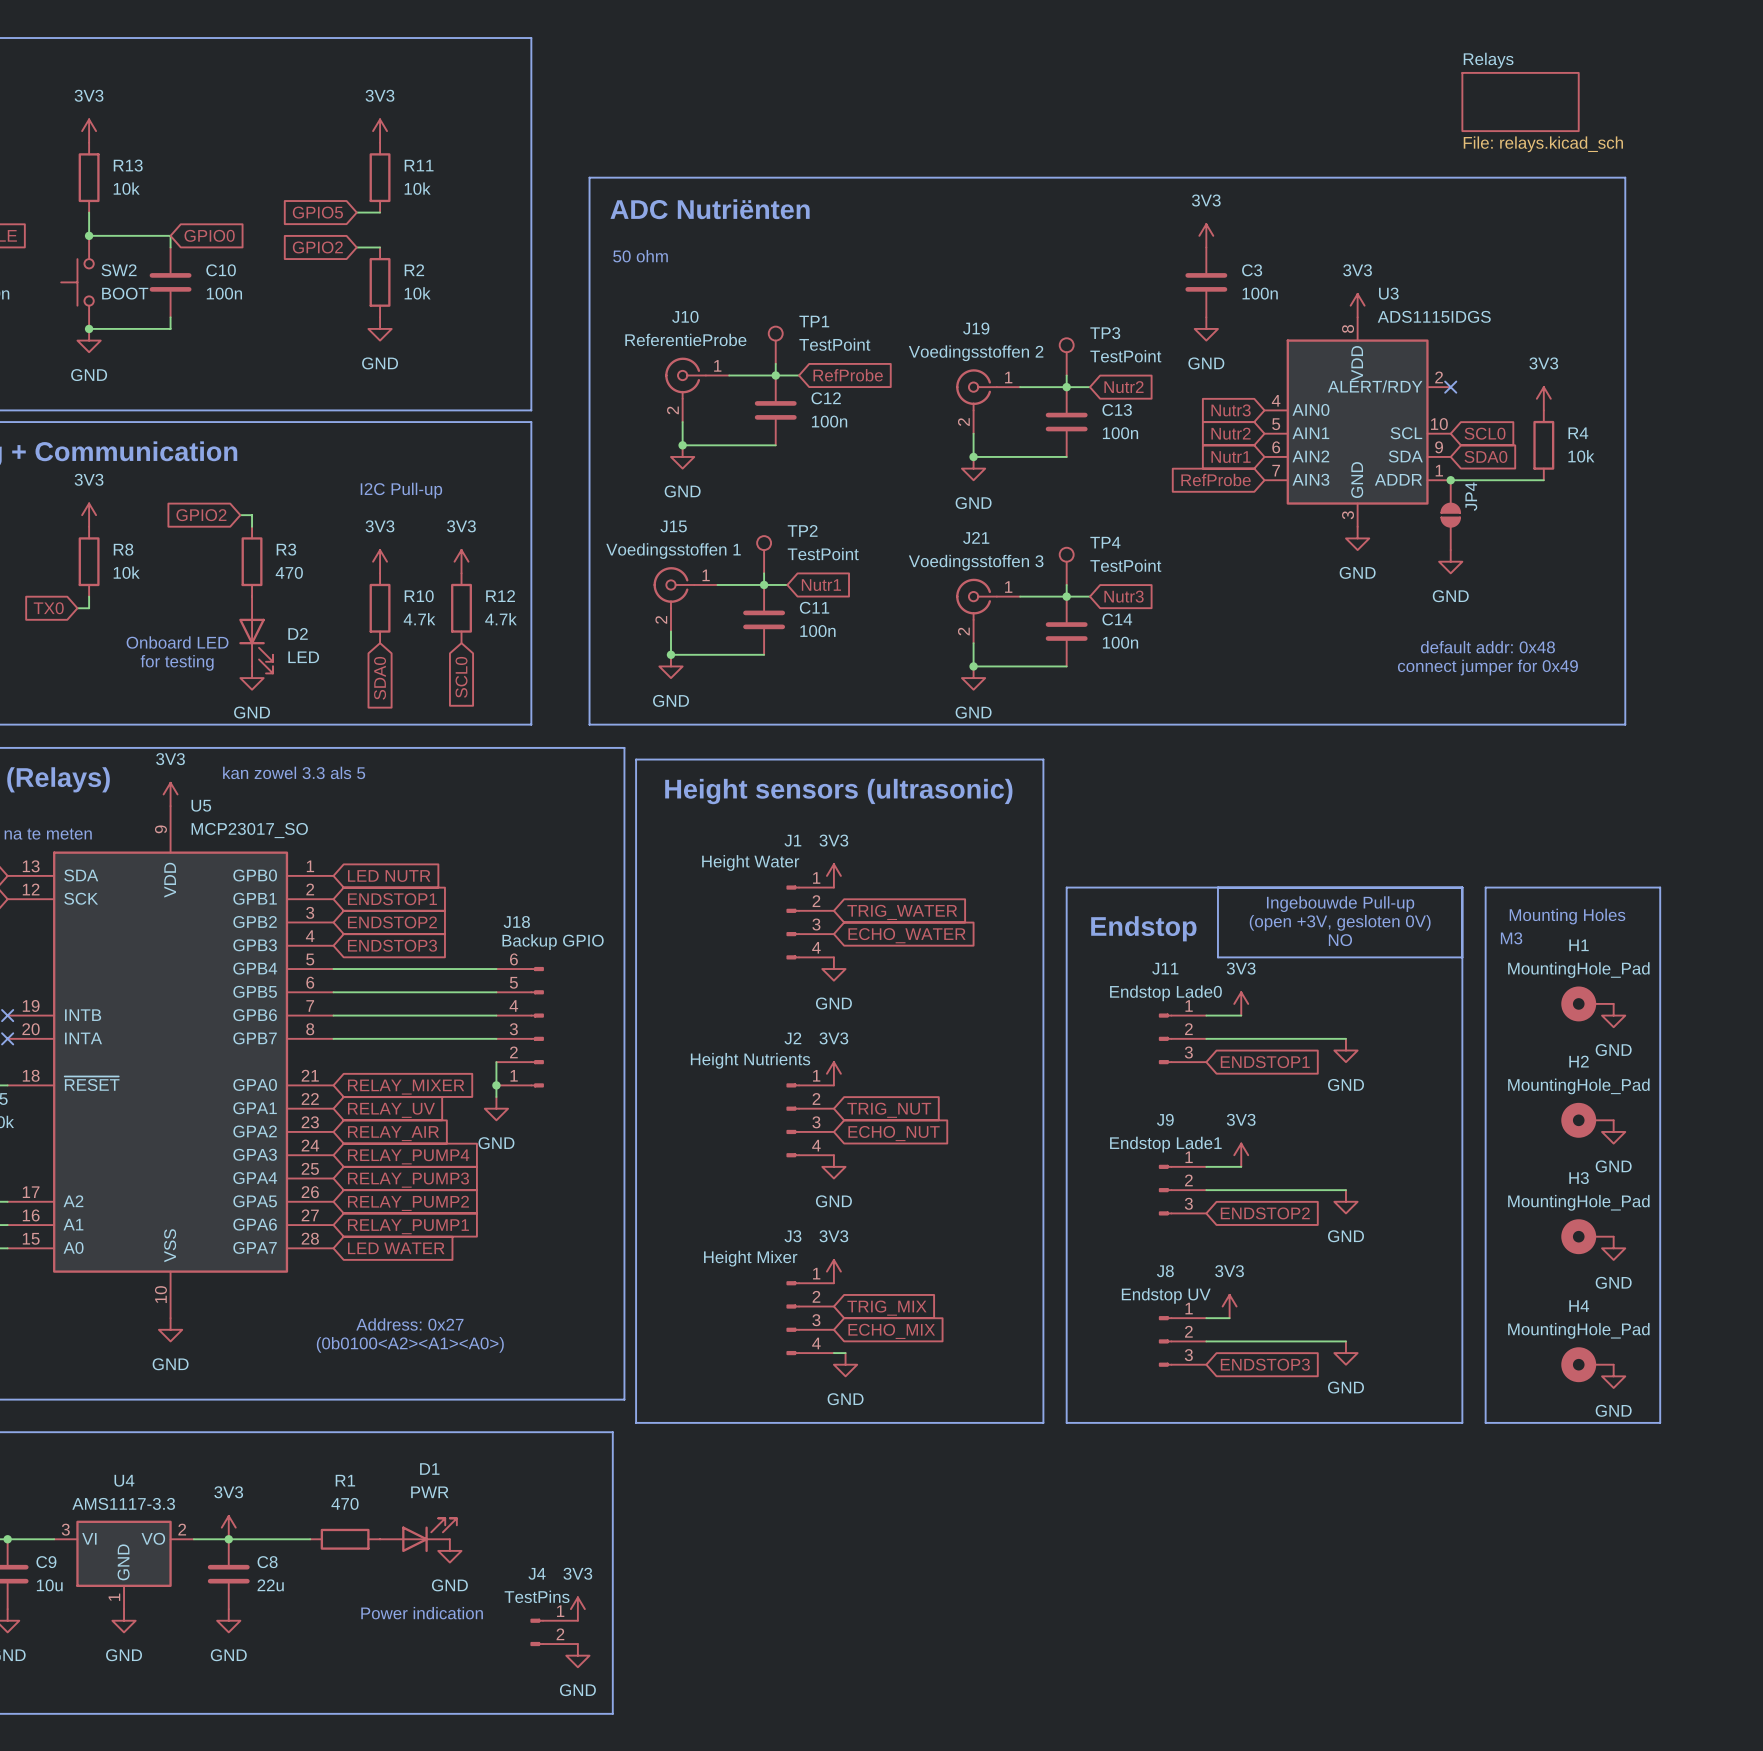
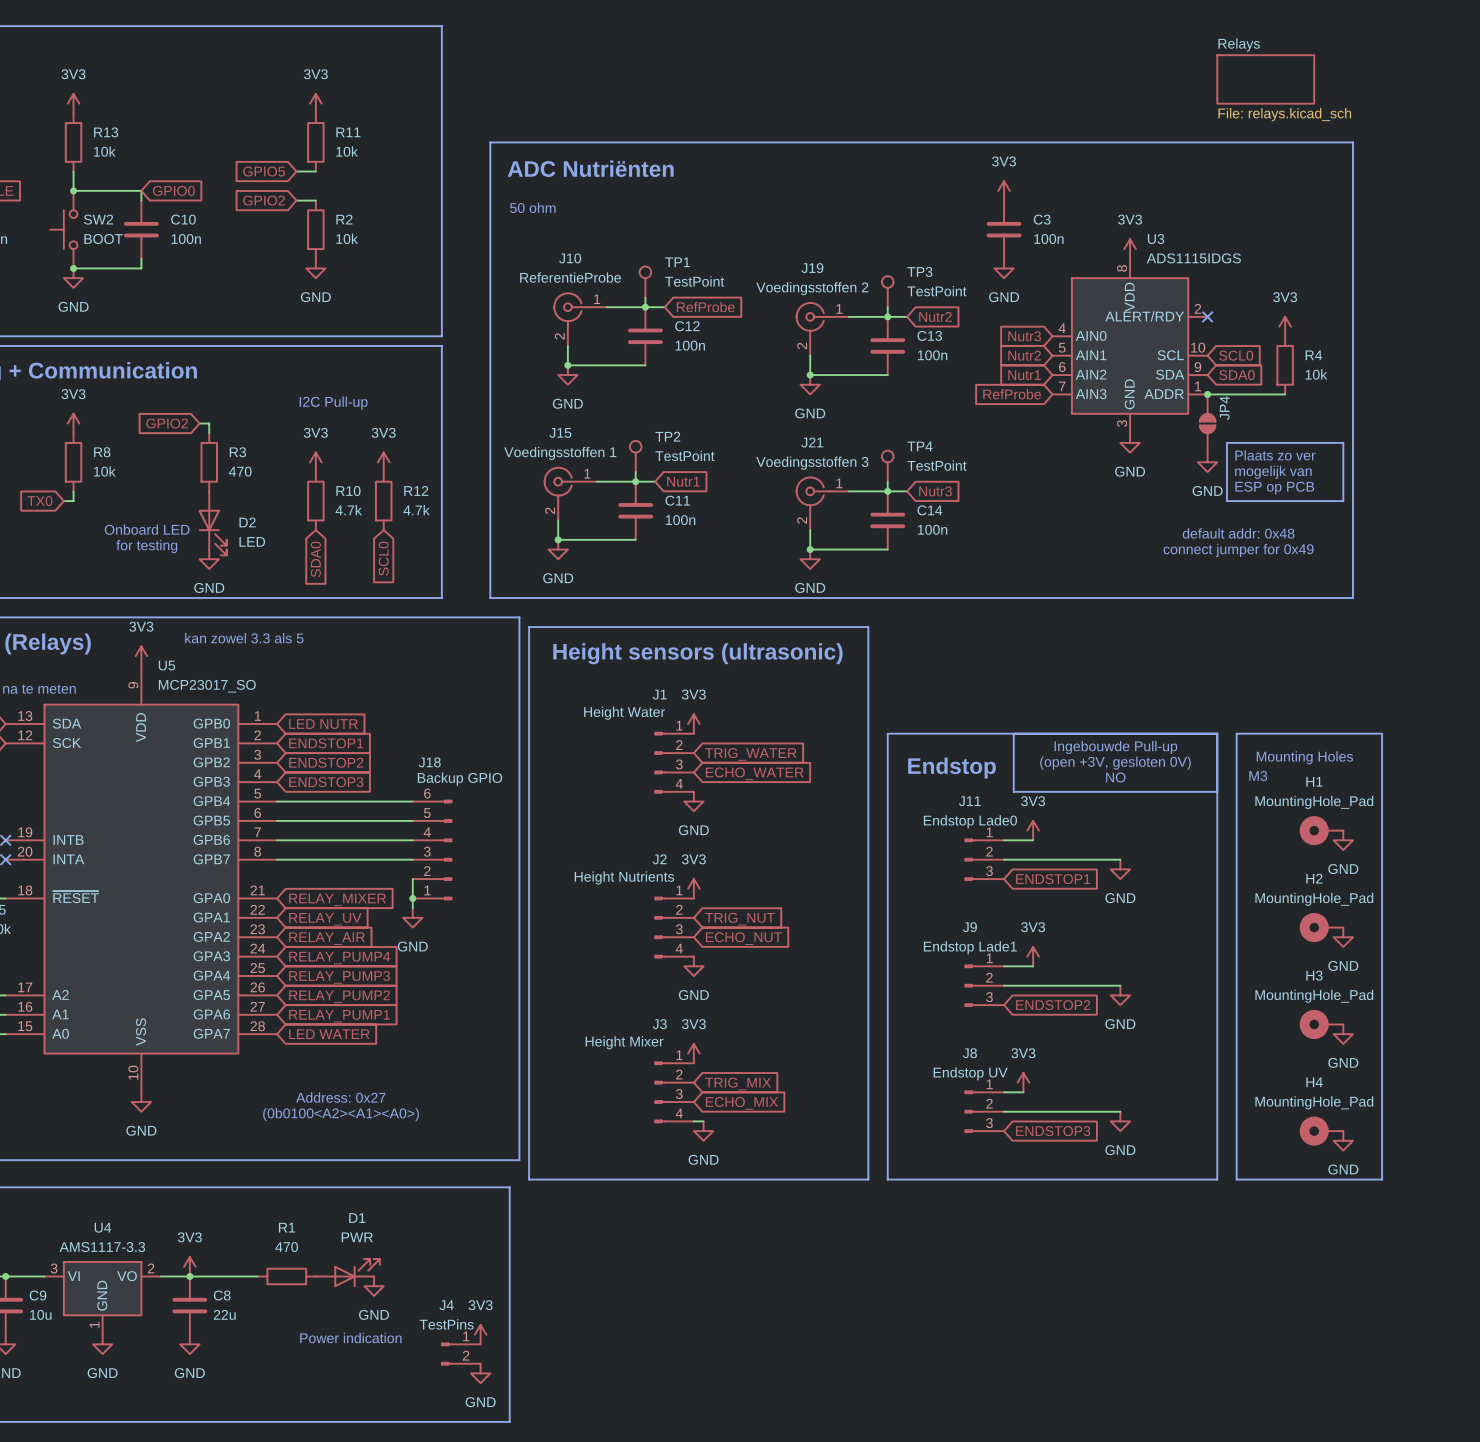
line: none -> (1226, 442) (1343, 442) (1343, 501) (1226, 501) (1226, 442)
text: none -> Plaats zo ver (1275, 455)
text: none -> mogelijk van (1273, 472)
text: none -> ESP op PCB (1274, 488)

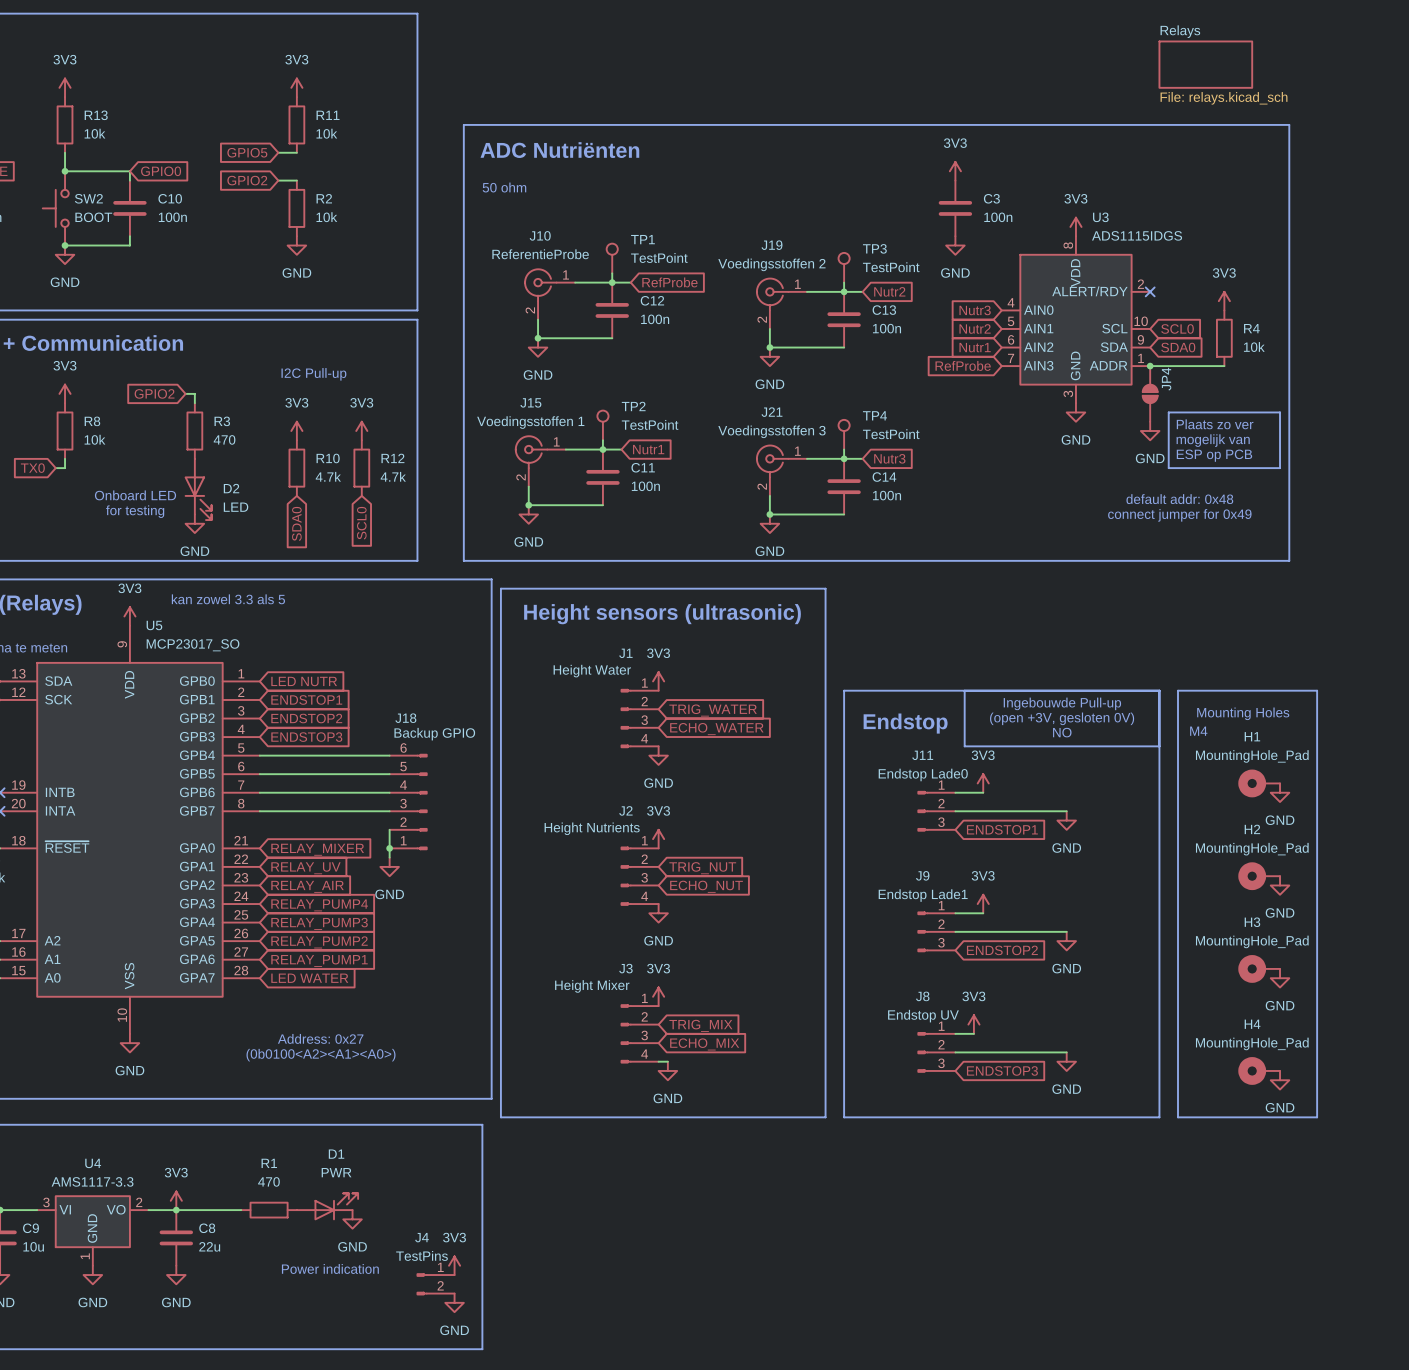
text: M3 (1258, 776) -> M4 (1198, 731)

